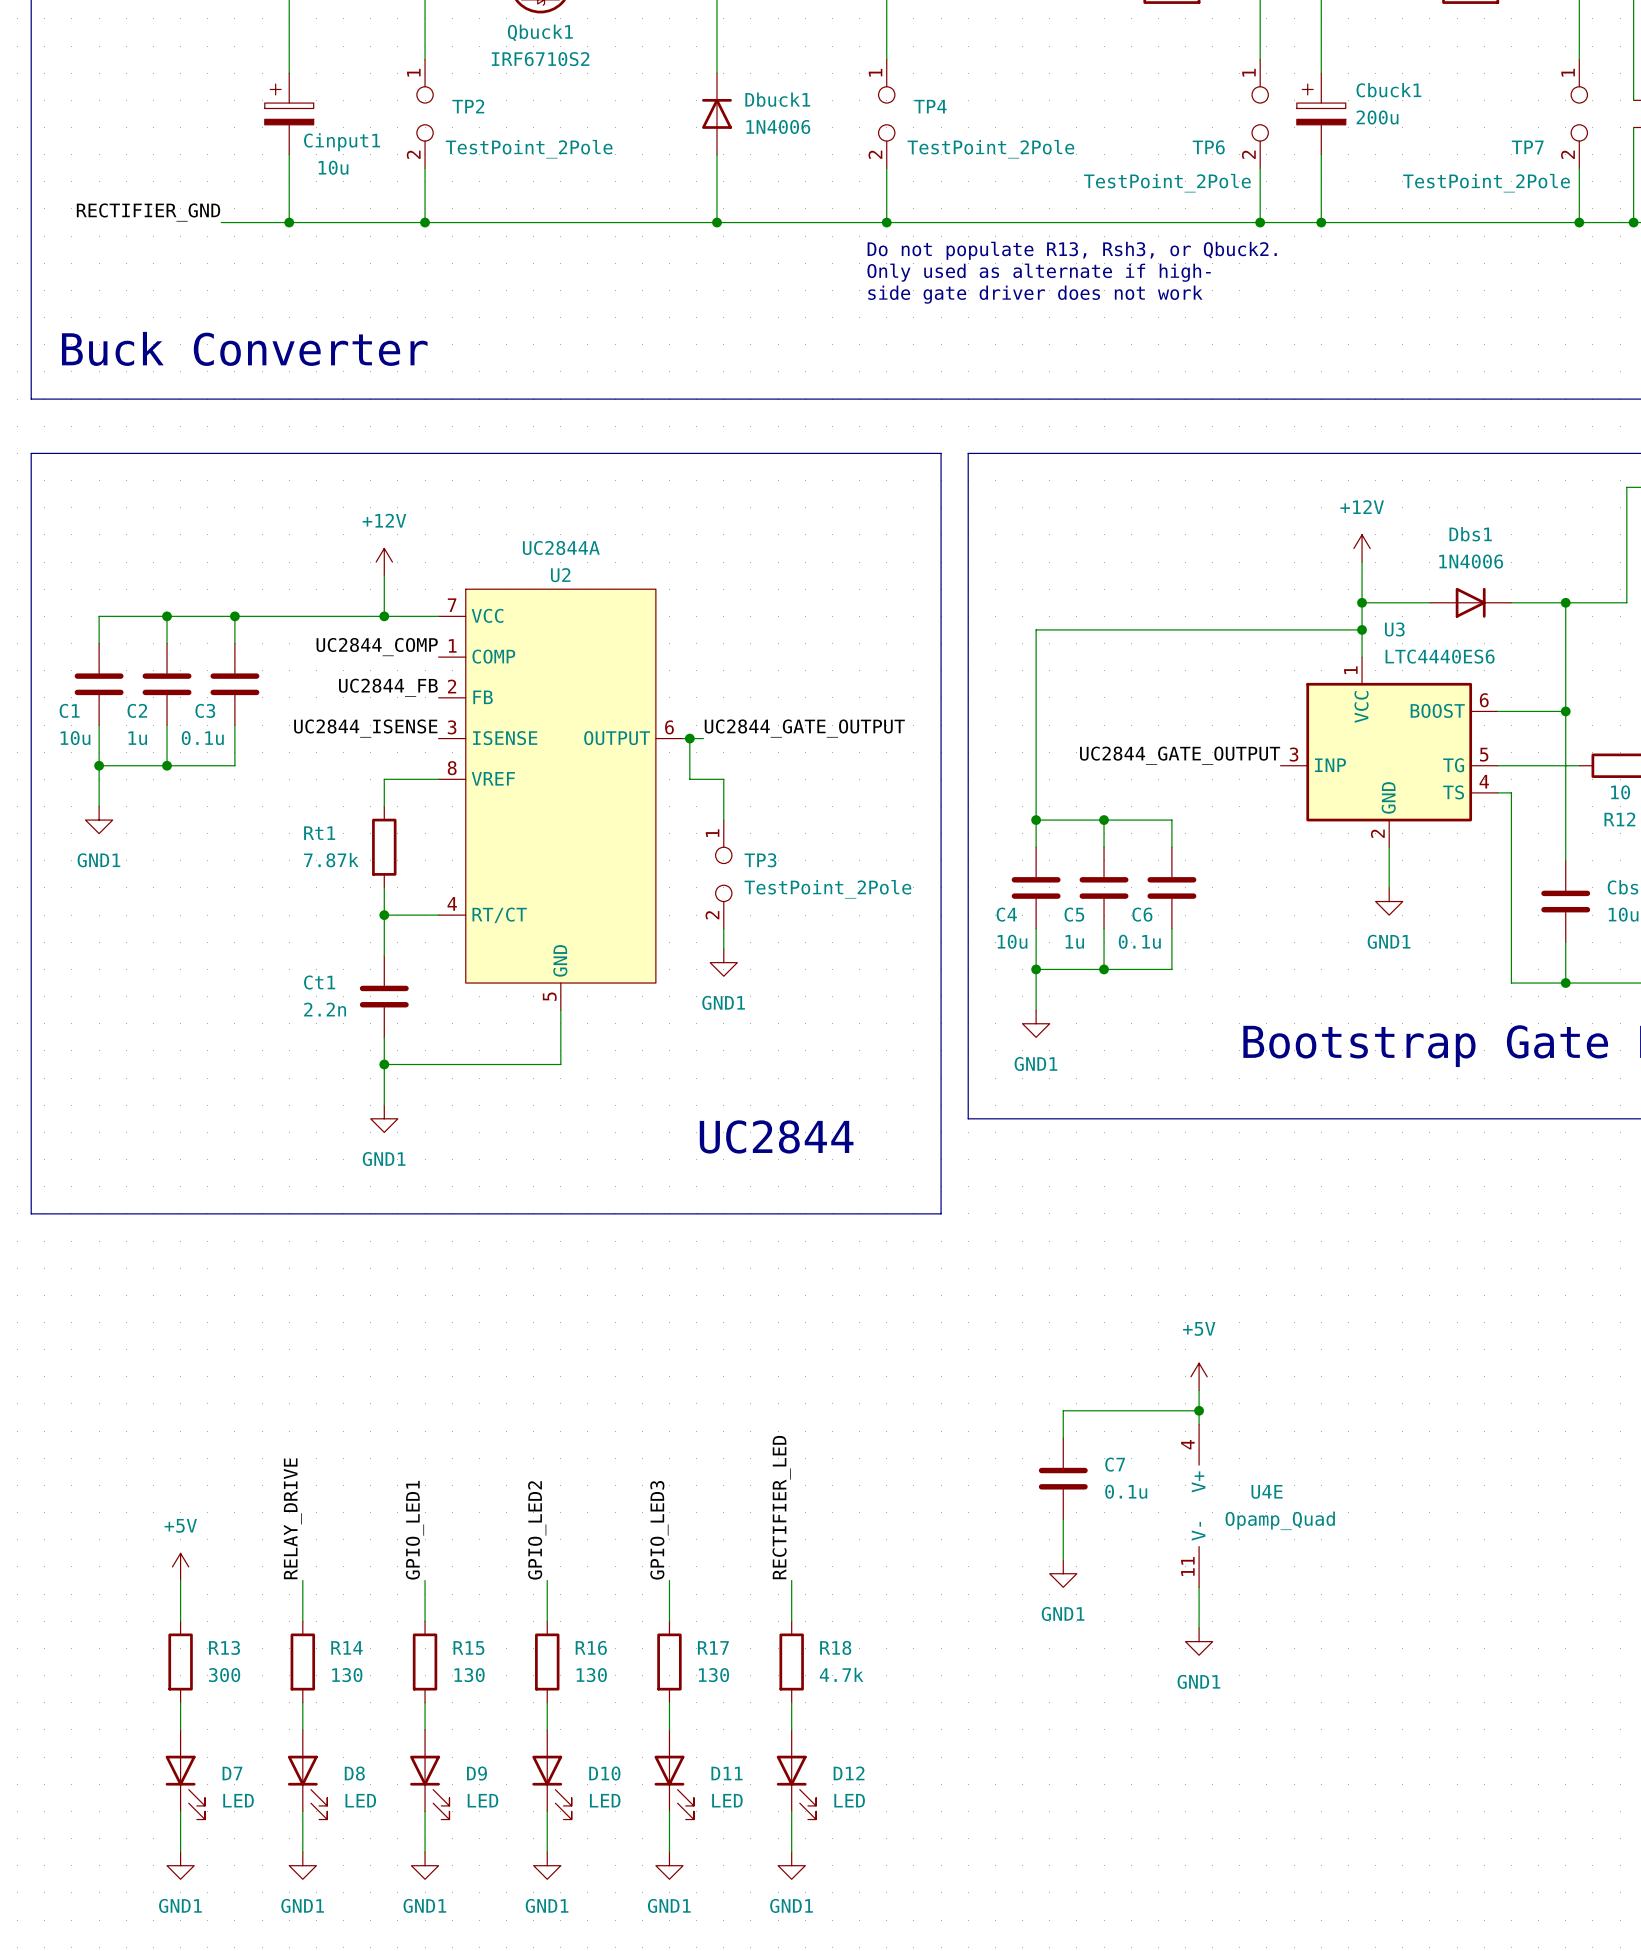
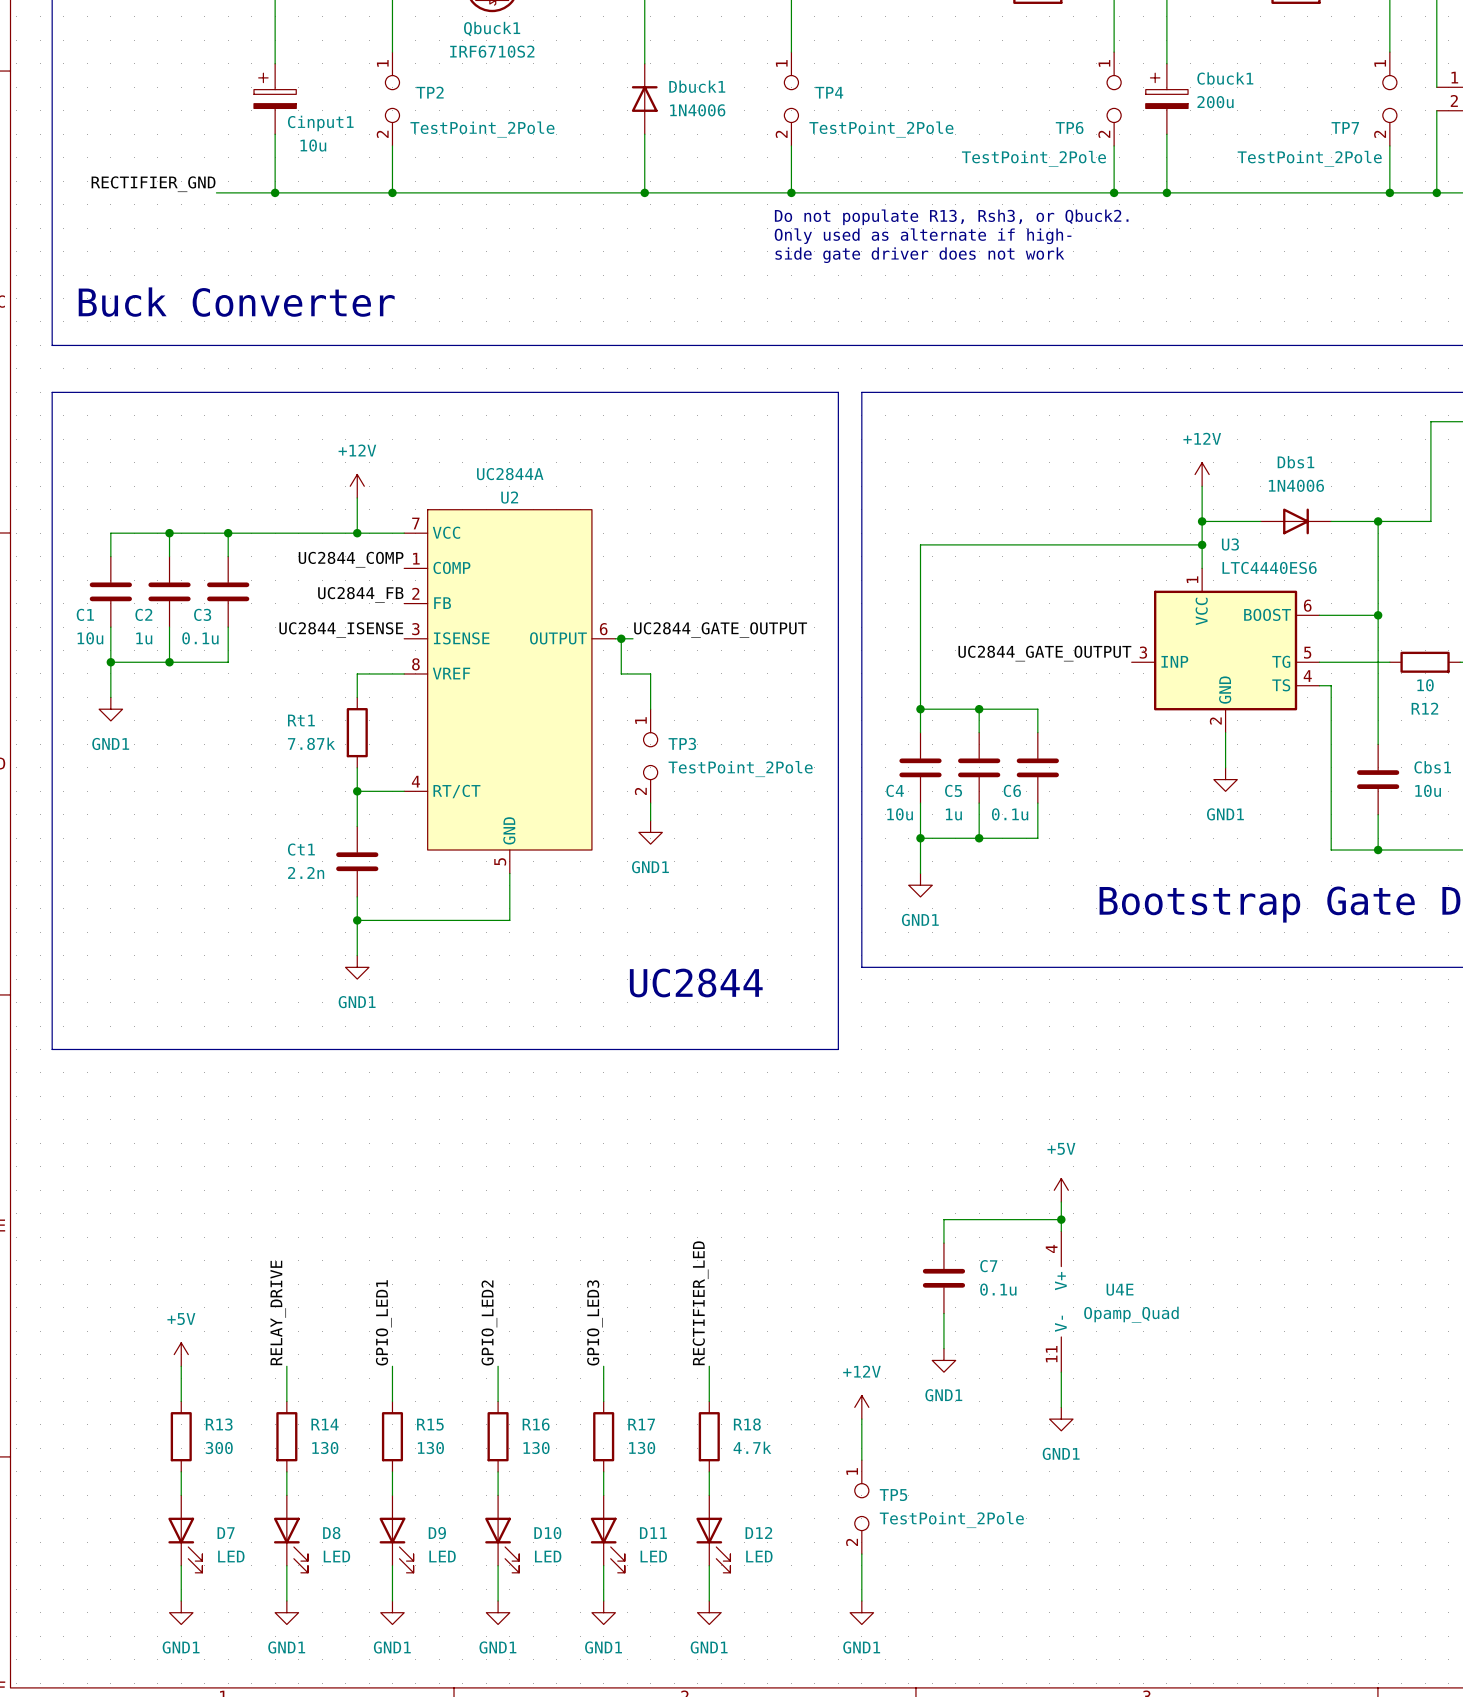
power symbol: none -> +12V (861, 1407)
wire: none -> (861, 1419) (861, 1460)
TP5: none -> TestPoint_2Pole (861, 1507)
wire: none -> (861, 1554) (861, 1600)
power symbol: none -> GND1 (861, 1612)

